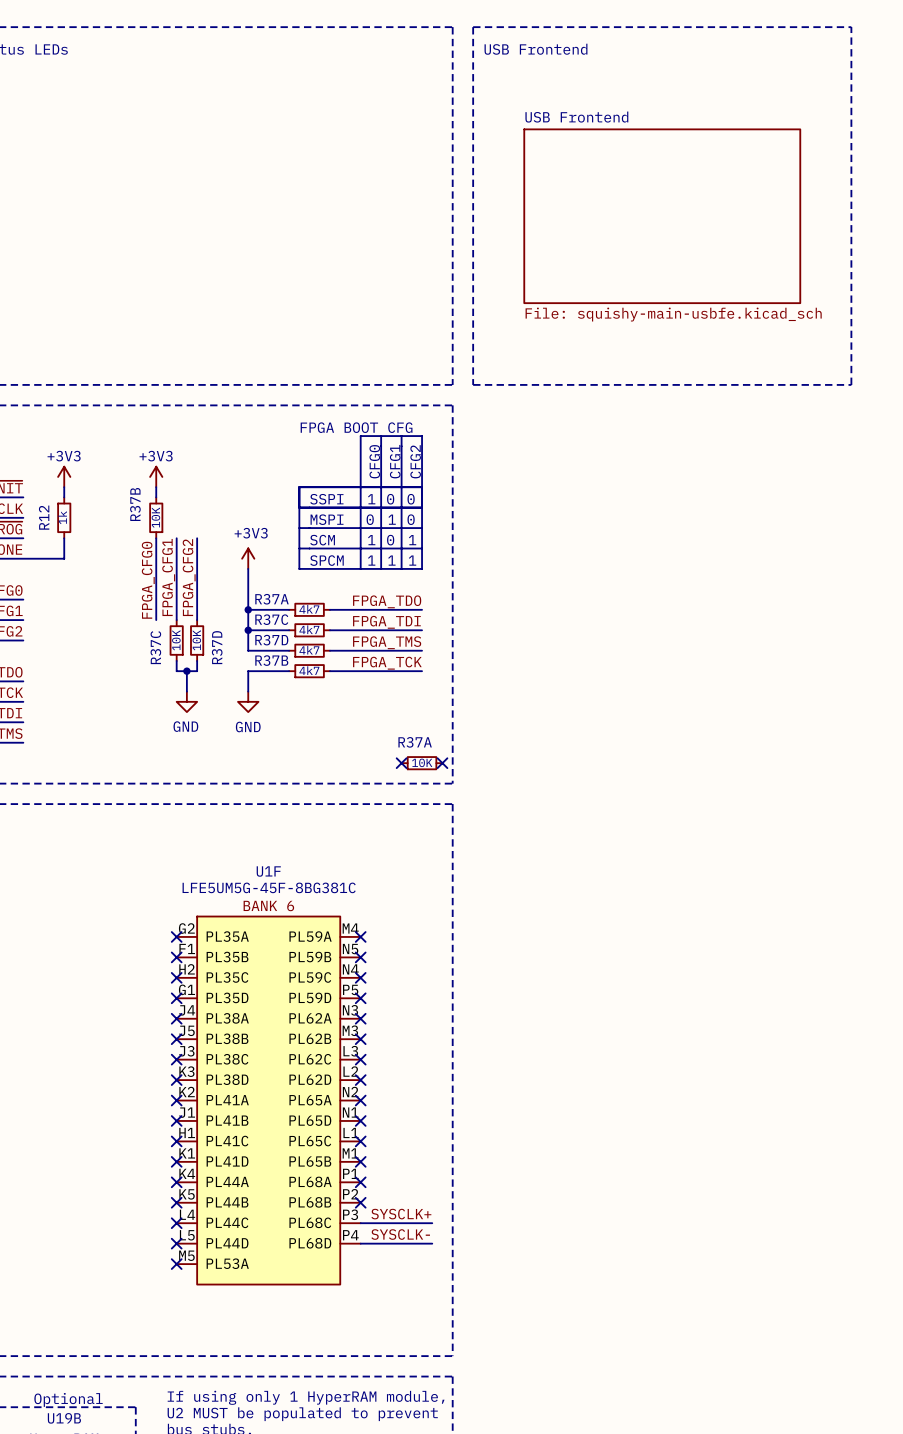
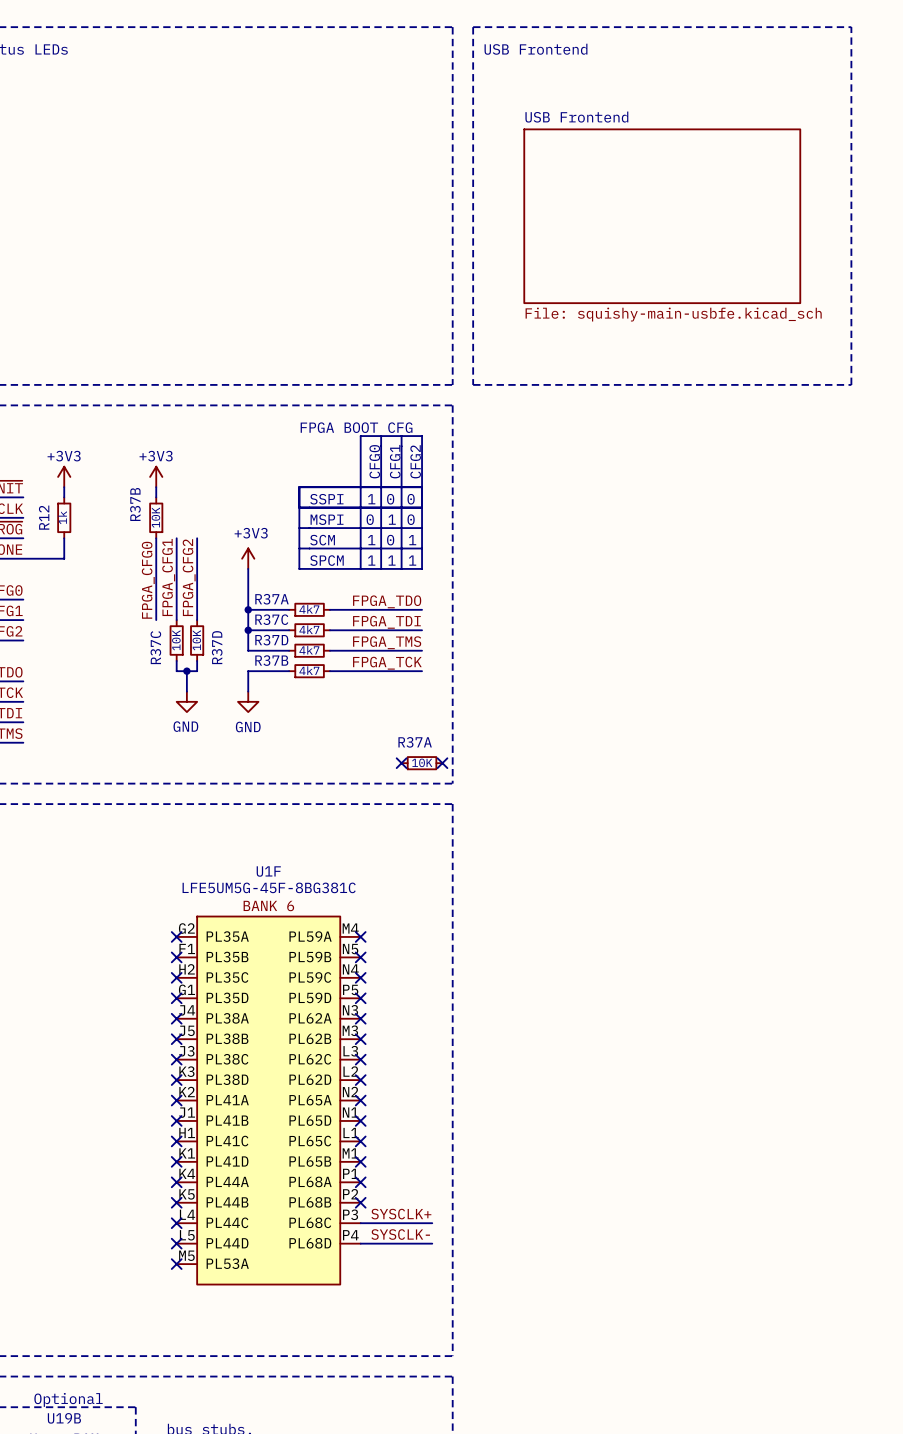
text: If using only 1 HyperRAM module, (306, 1397) -> none
text: U2 MUST be populated to prevent (302, 1414) -> none

